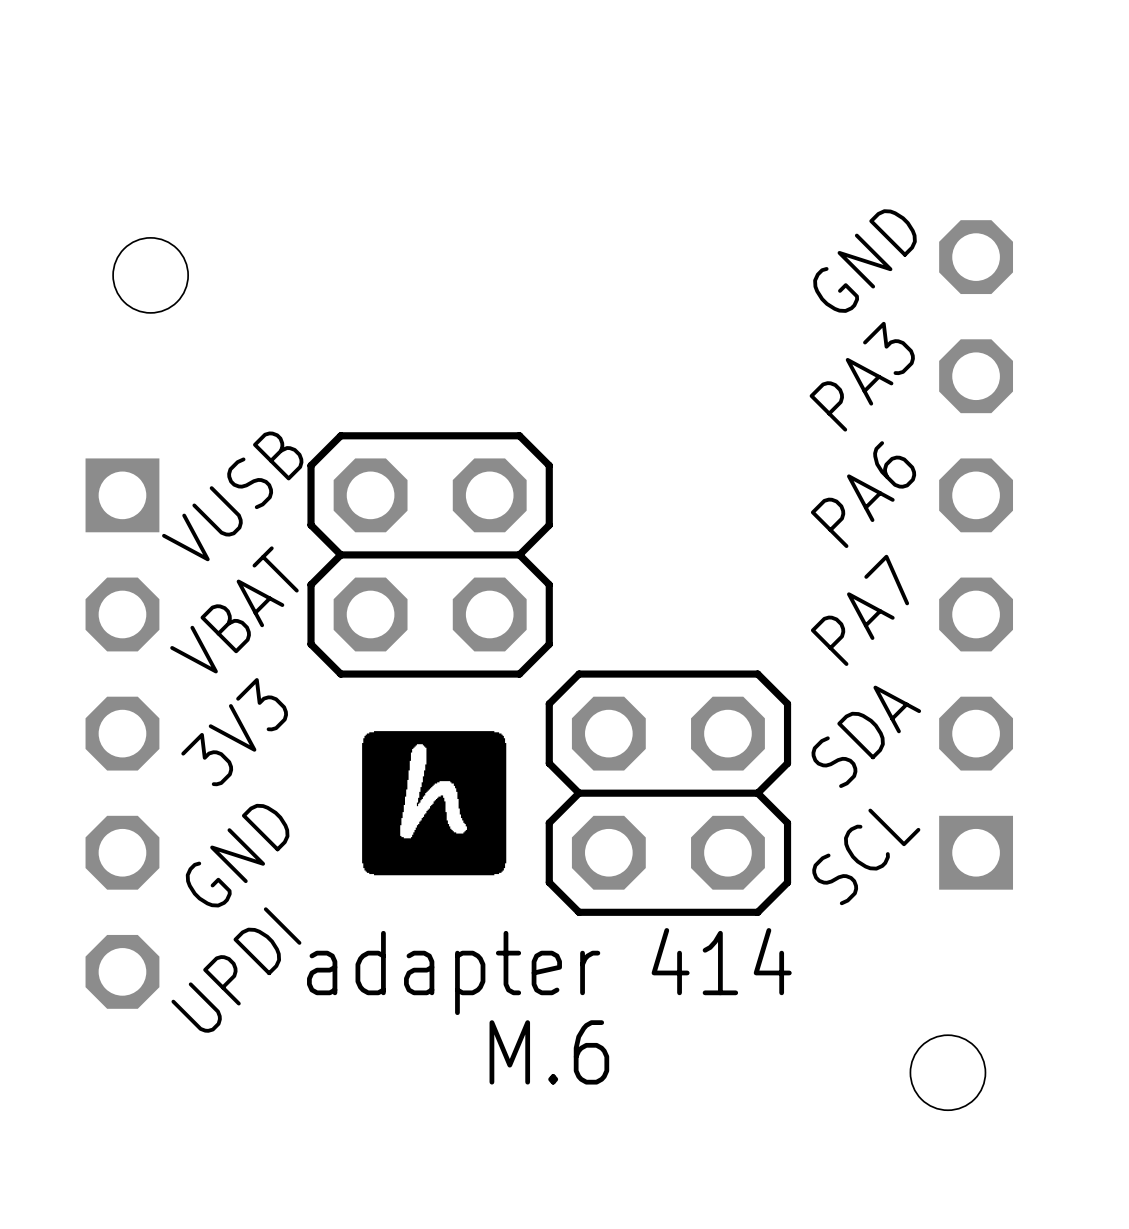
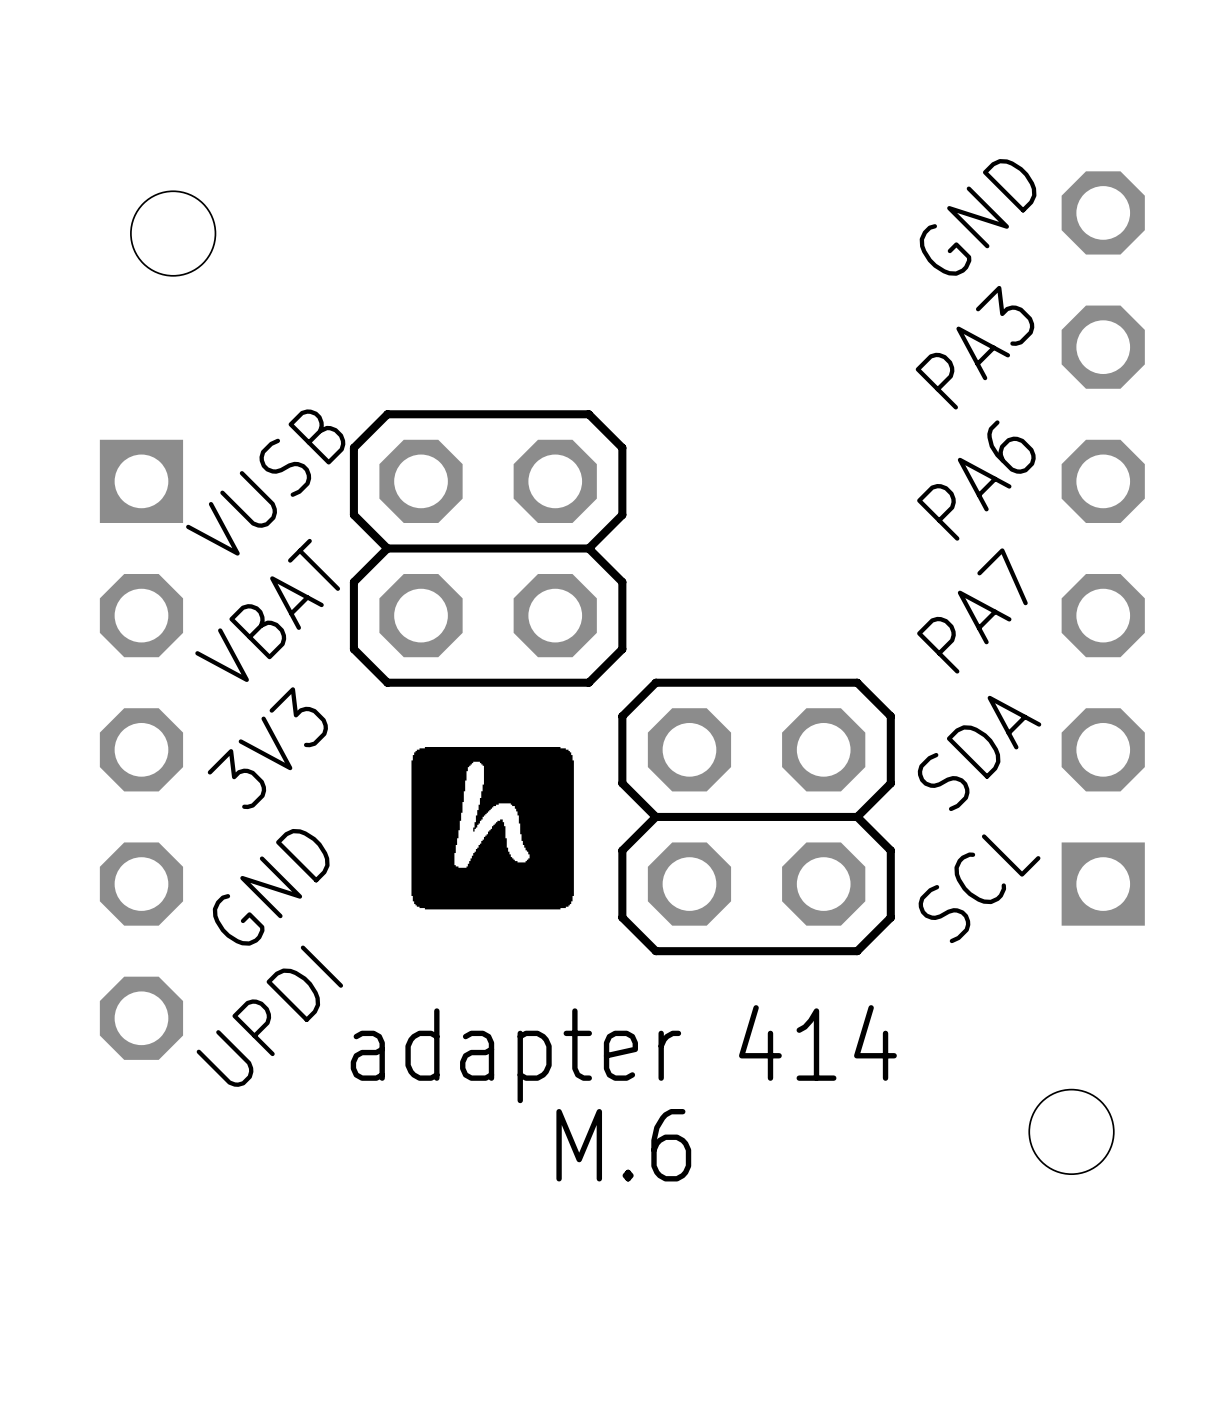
text position: adapter 414 (549, 971) -> adapter 414 (623, 1054)
text position: M.6 (549, 1052) -> M.6 (623, 1145)

